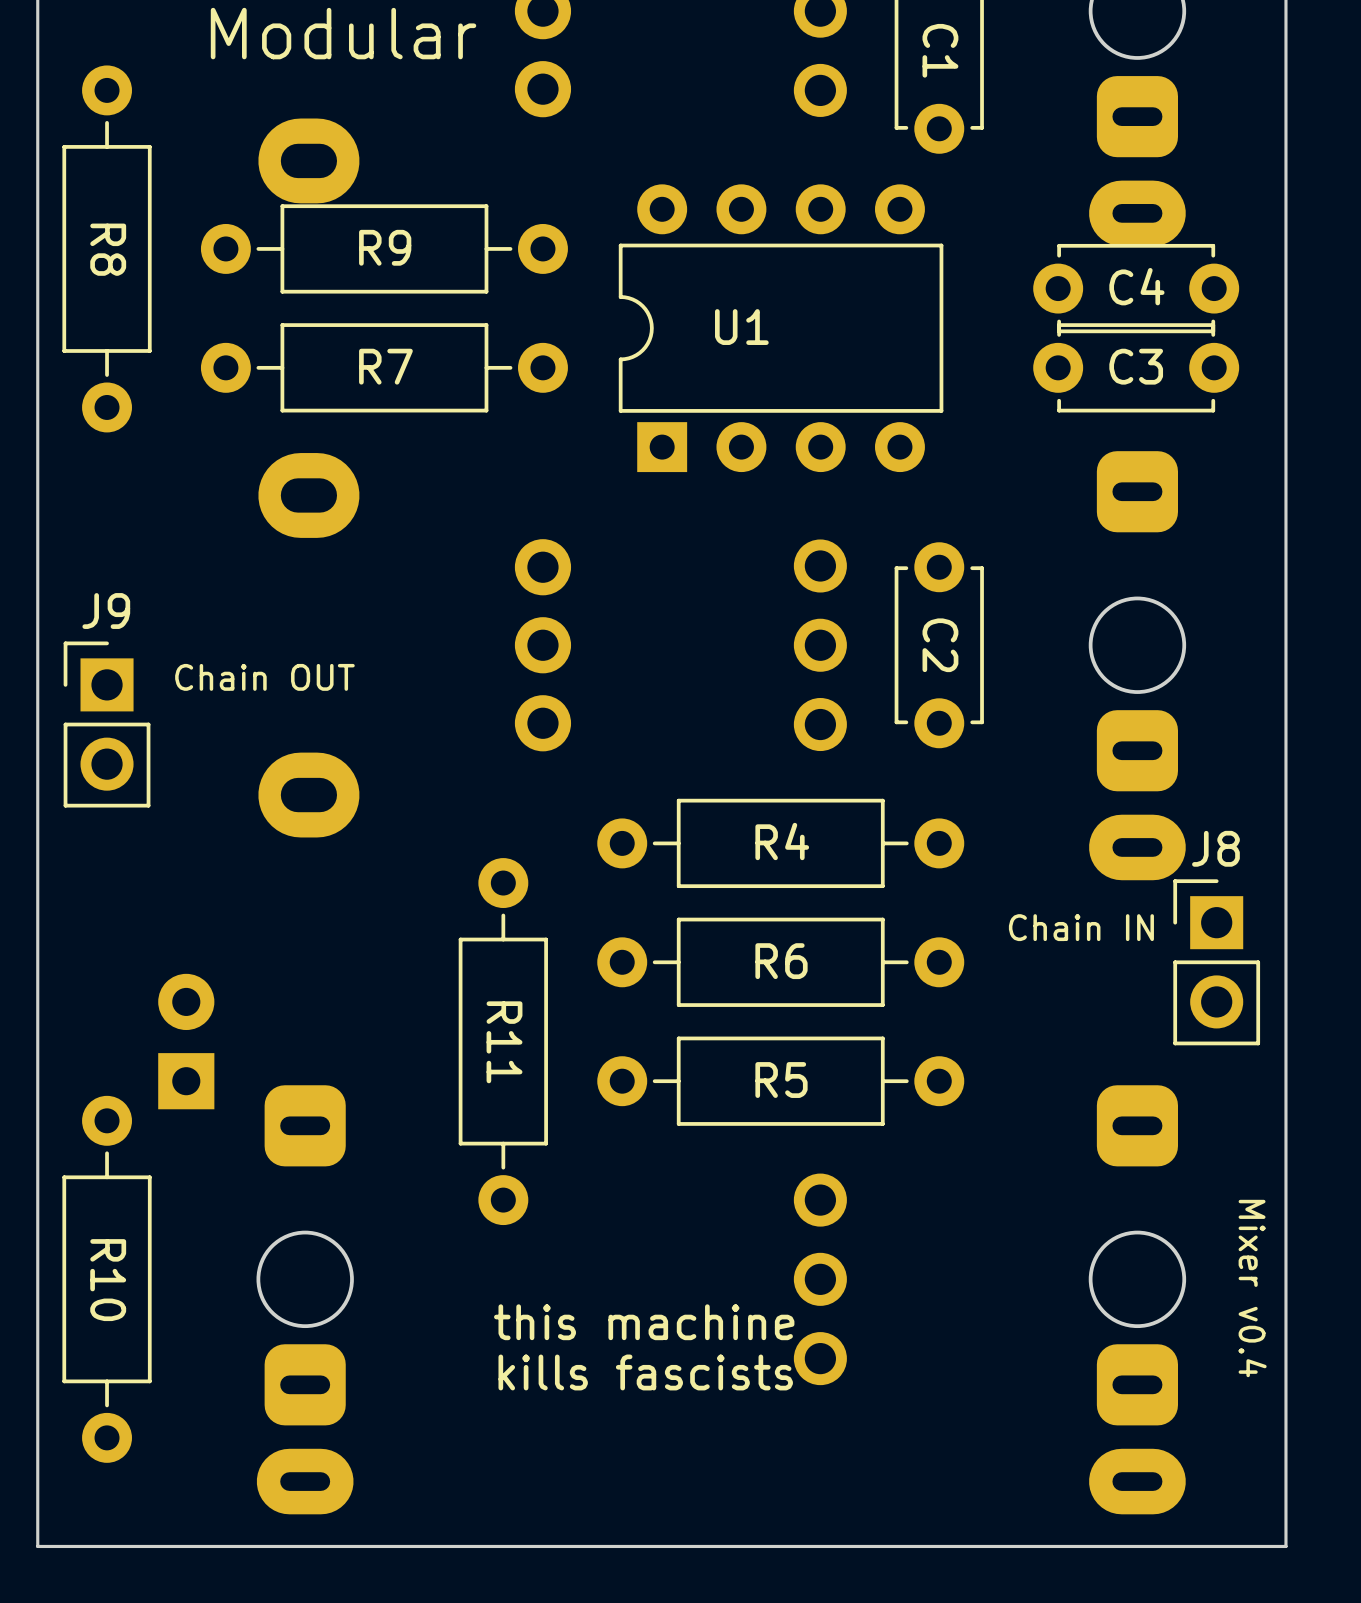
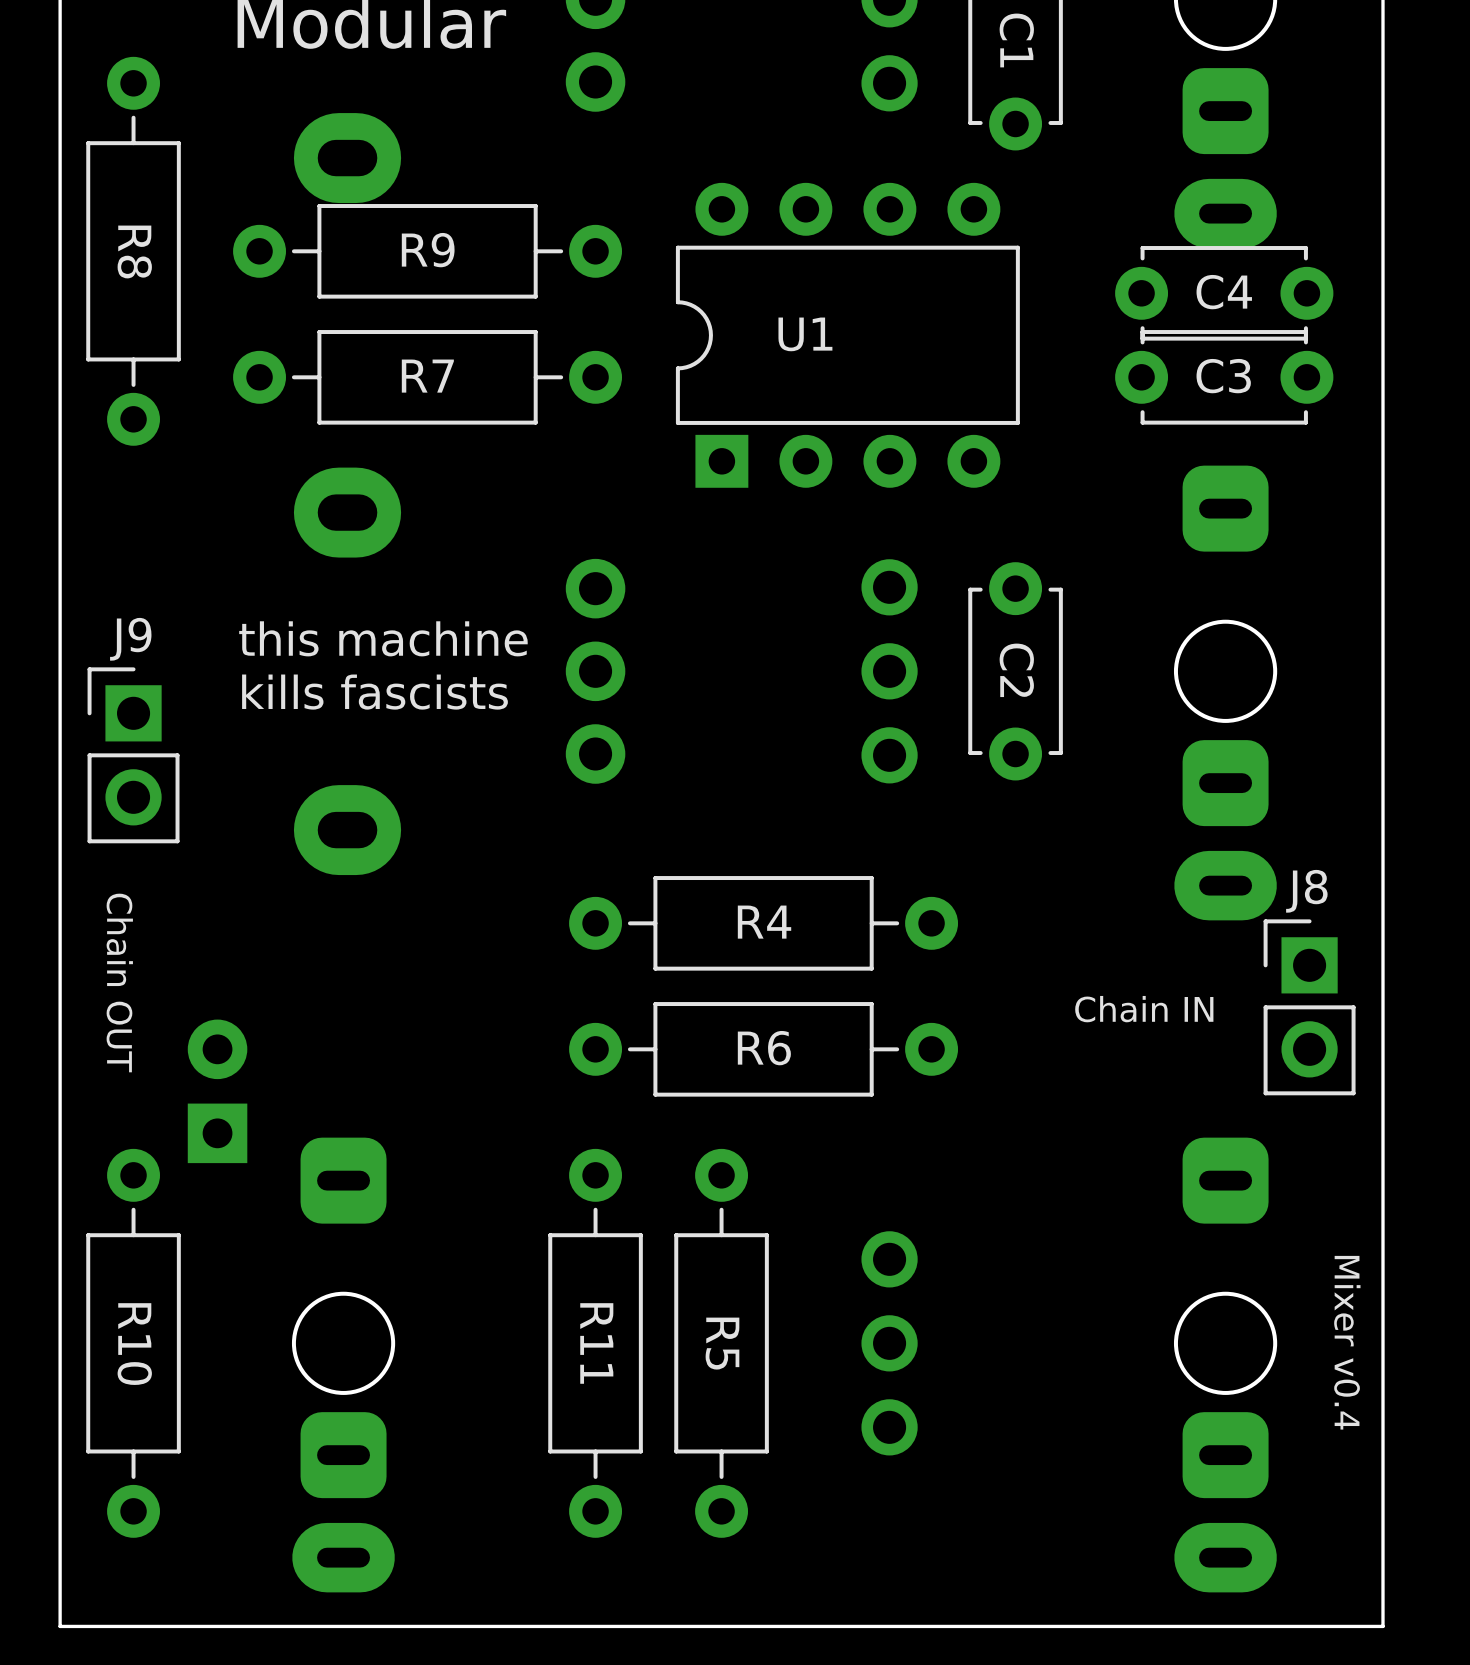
text rotation: 0° (264, 677) -> 90° clockwise (119, 982)
text position: Chain OUT (264, 677) -> Chain OUT (119, 982)
R4 position: (780, 843) -> (763, 923)
text position: Chain IN (1081, 927) -> Chain IN (1144, 1009)
R6 position: (780, 962) -> (763, 1049)
R11 position: (503, 1041) -> (595, 1343)
R5 rotation: 0° (780, 1081) -> 90° clockwise (721, 1343)
R5 position: (780, 1081) -> (721, 1343)
text position: this machine (644, 1322) -> this machine (383, 638)
text position: kills fascists (645, 1372) -> kills fascists (375, 692)

